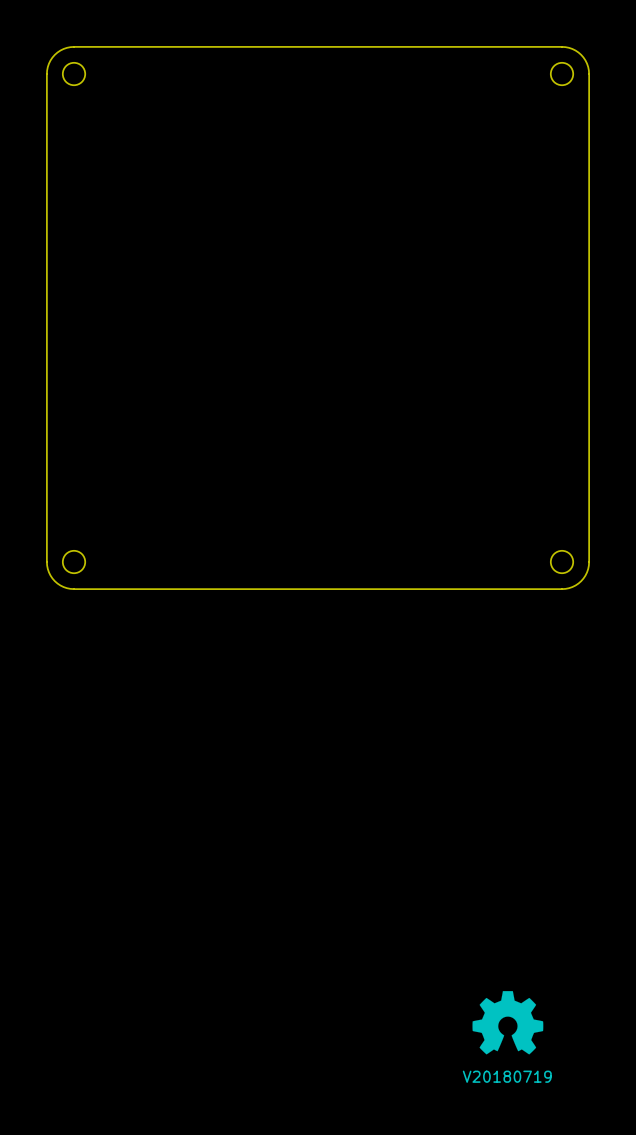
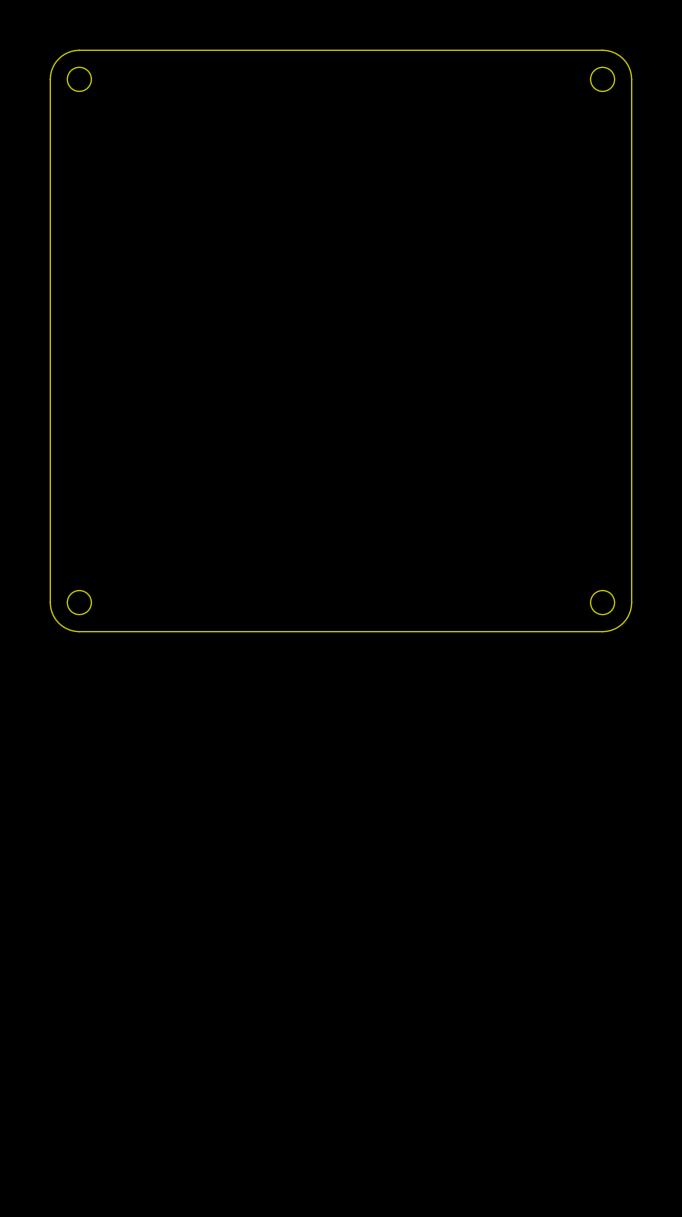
drawing: [472, 991, 544, 1055] -> none

